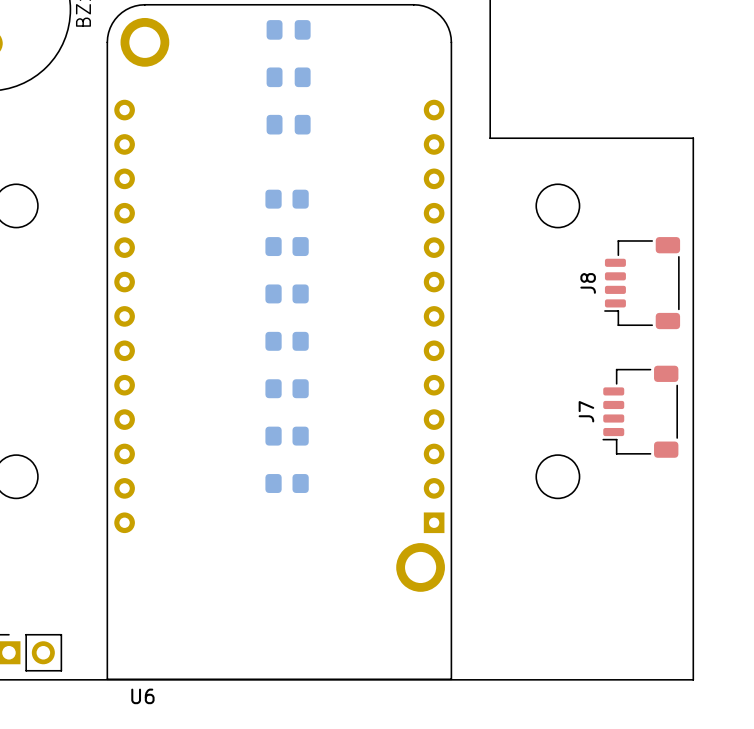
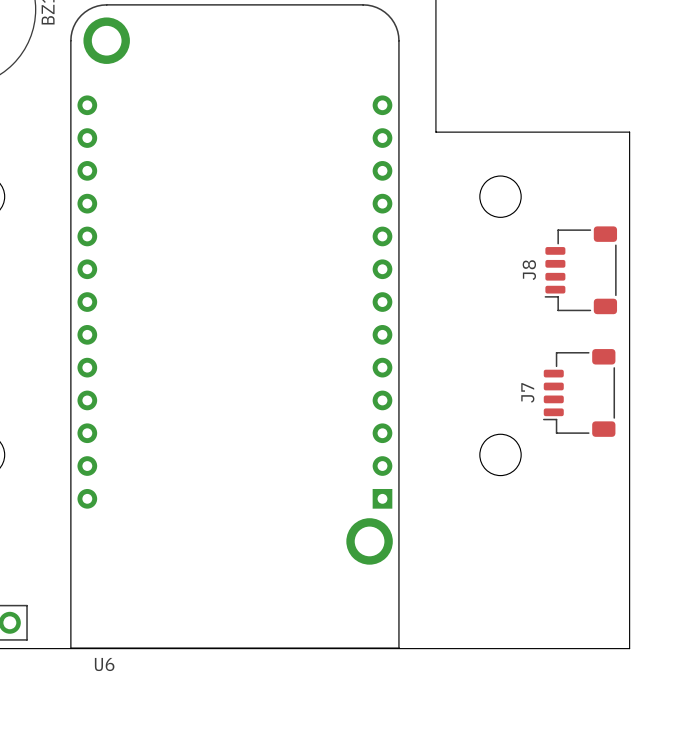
part: (288, 29) -> none
part: (288, 77) -> none
part: (288, 124) -> none
part: (287, 199) -> none
part: (287, 246) -> none
part: (287, 293) -> none
part: (287, 341) -> none
part: (287, 388) -> none
part: (287, 436) -> none
part: (287, 483) -> none

